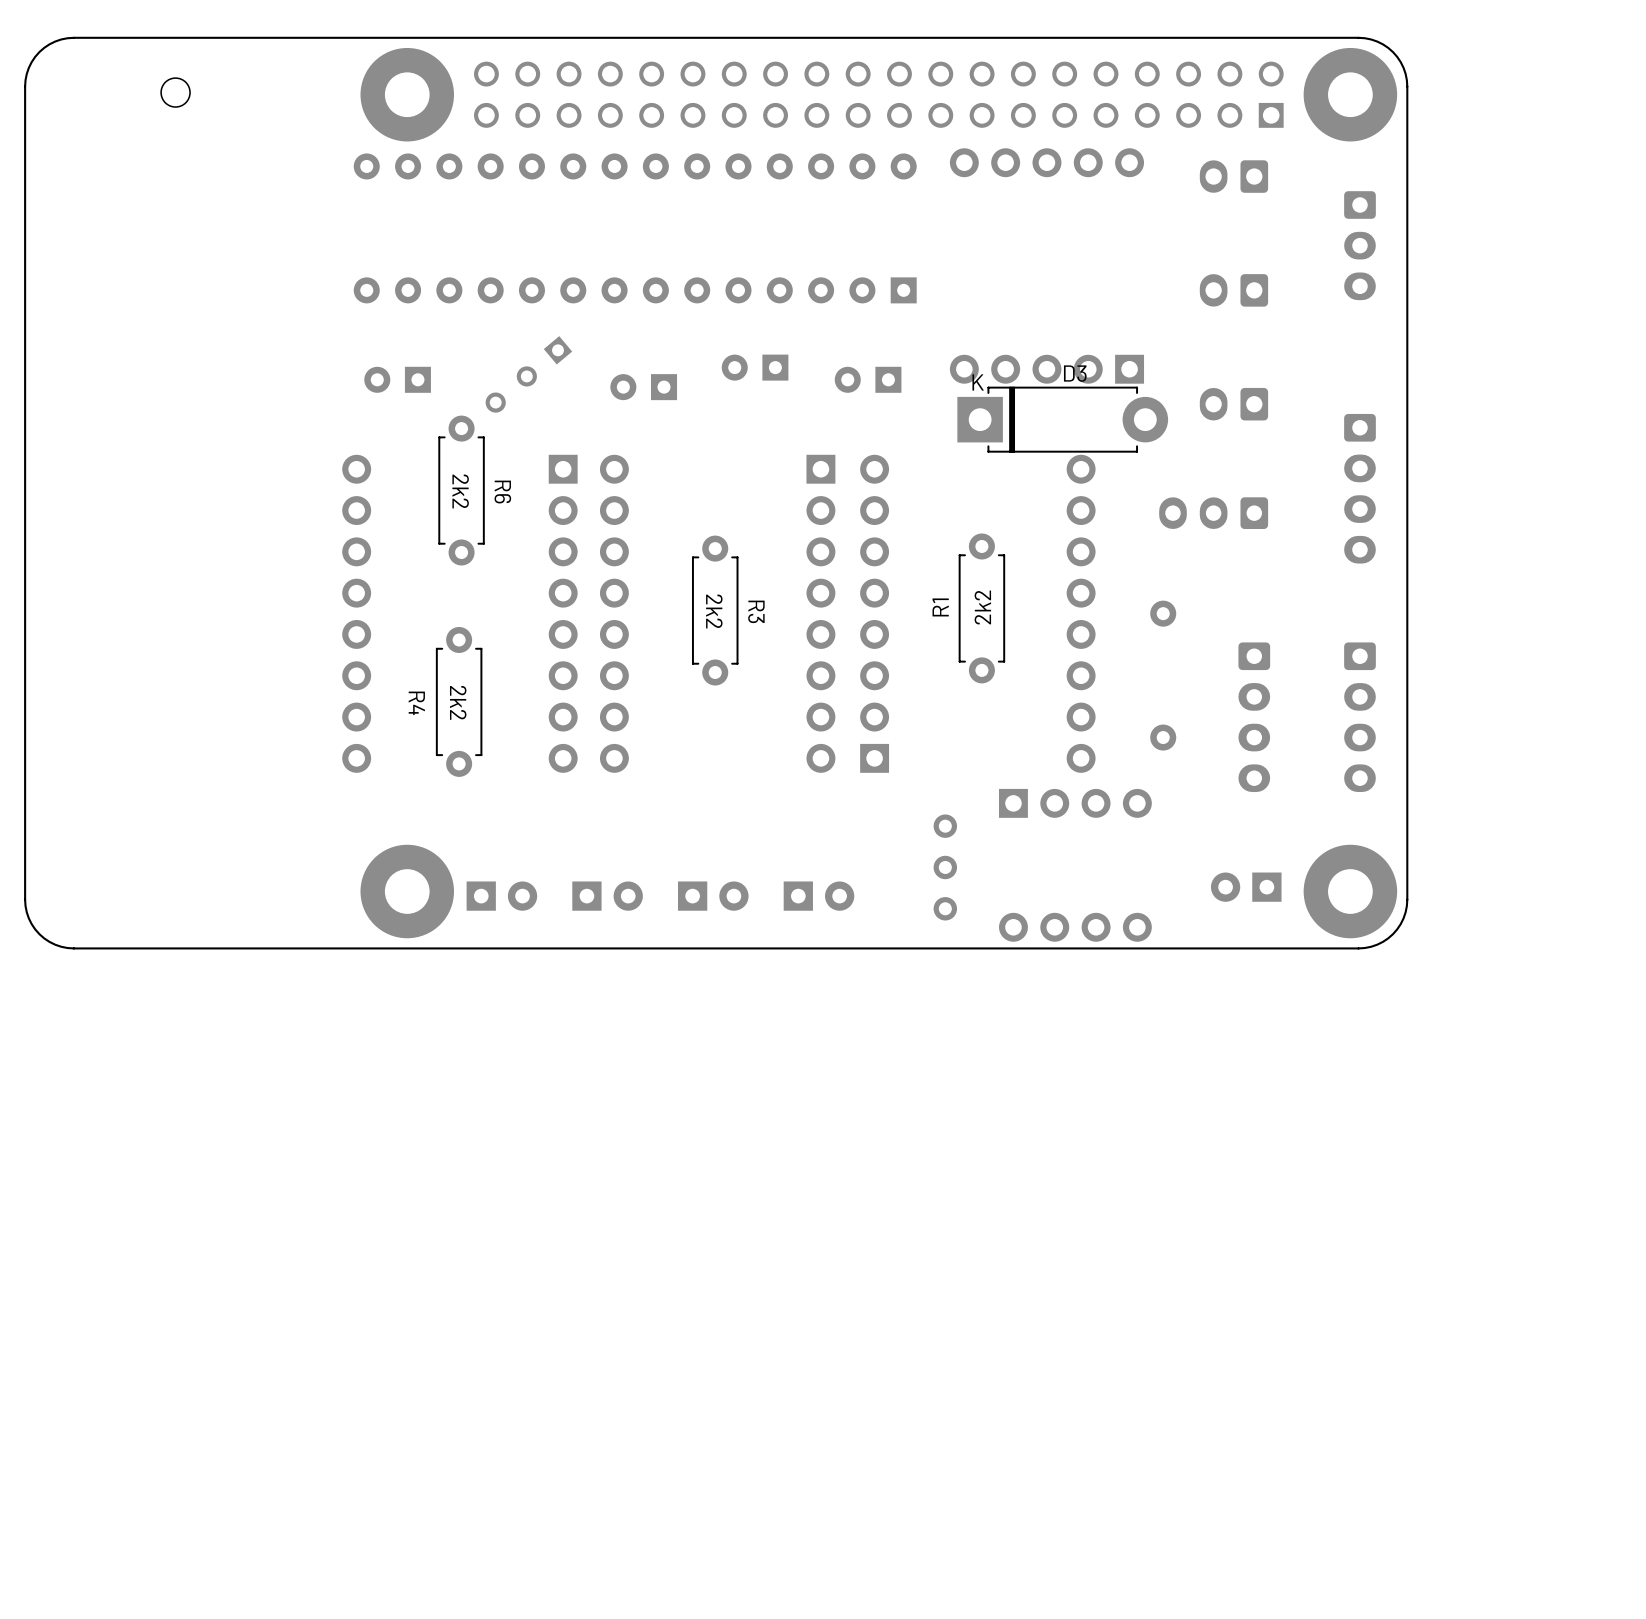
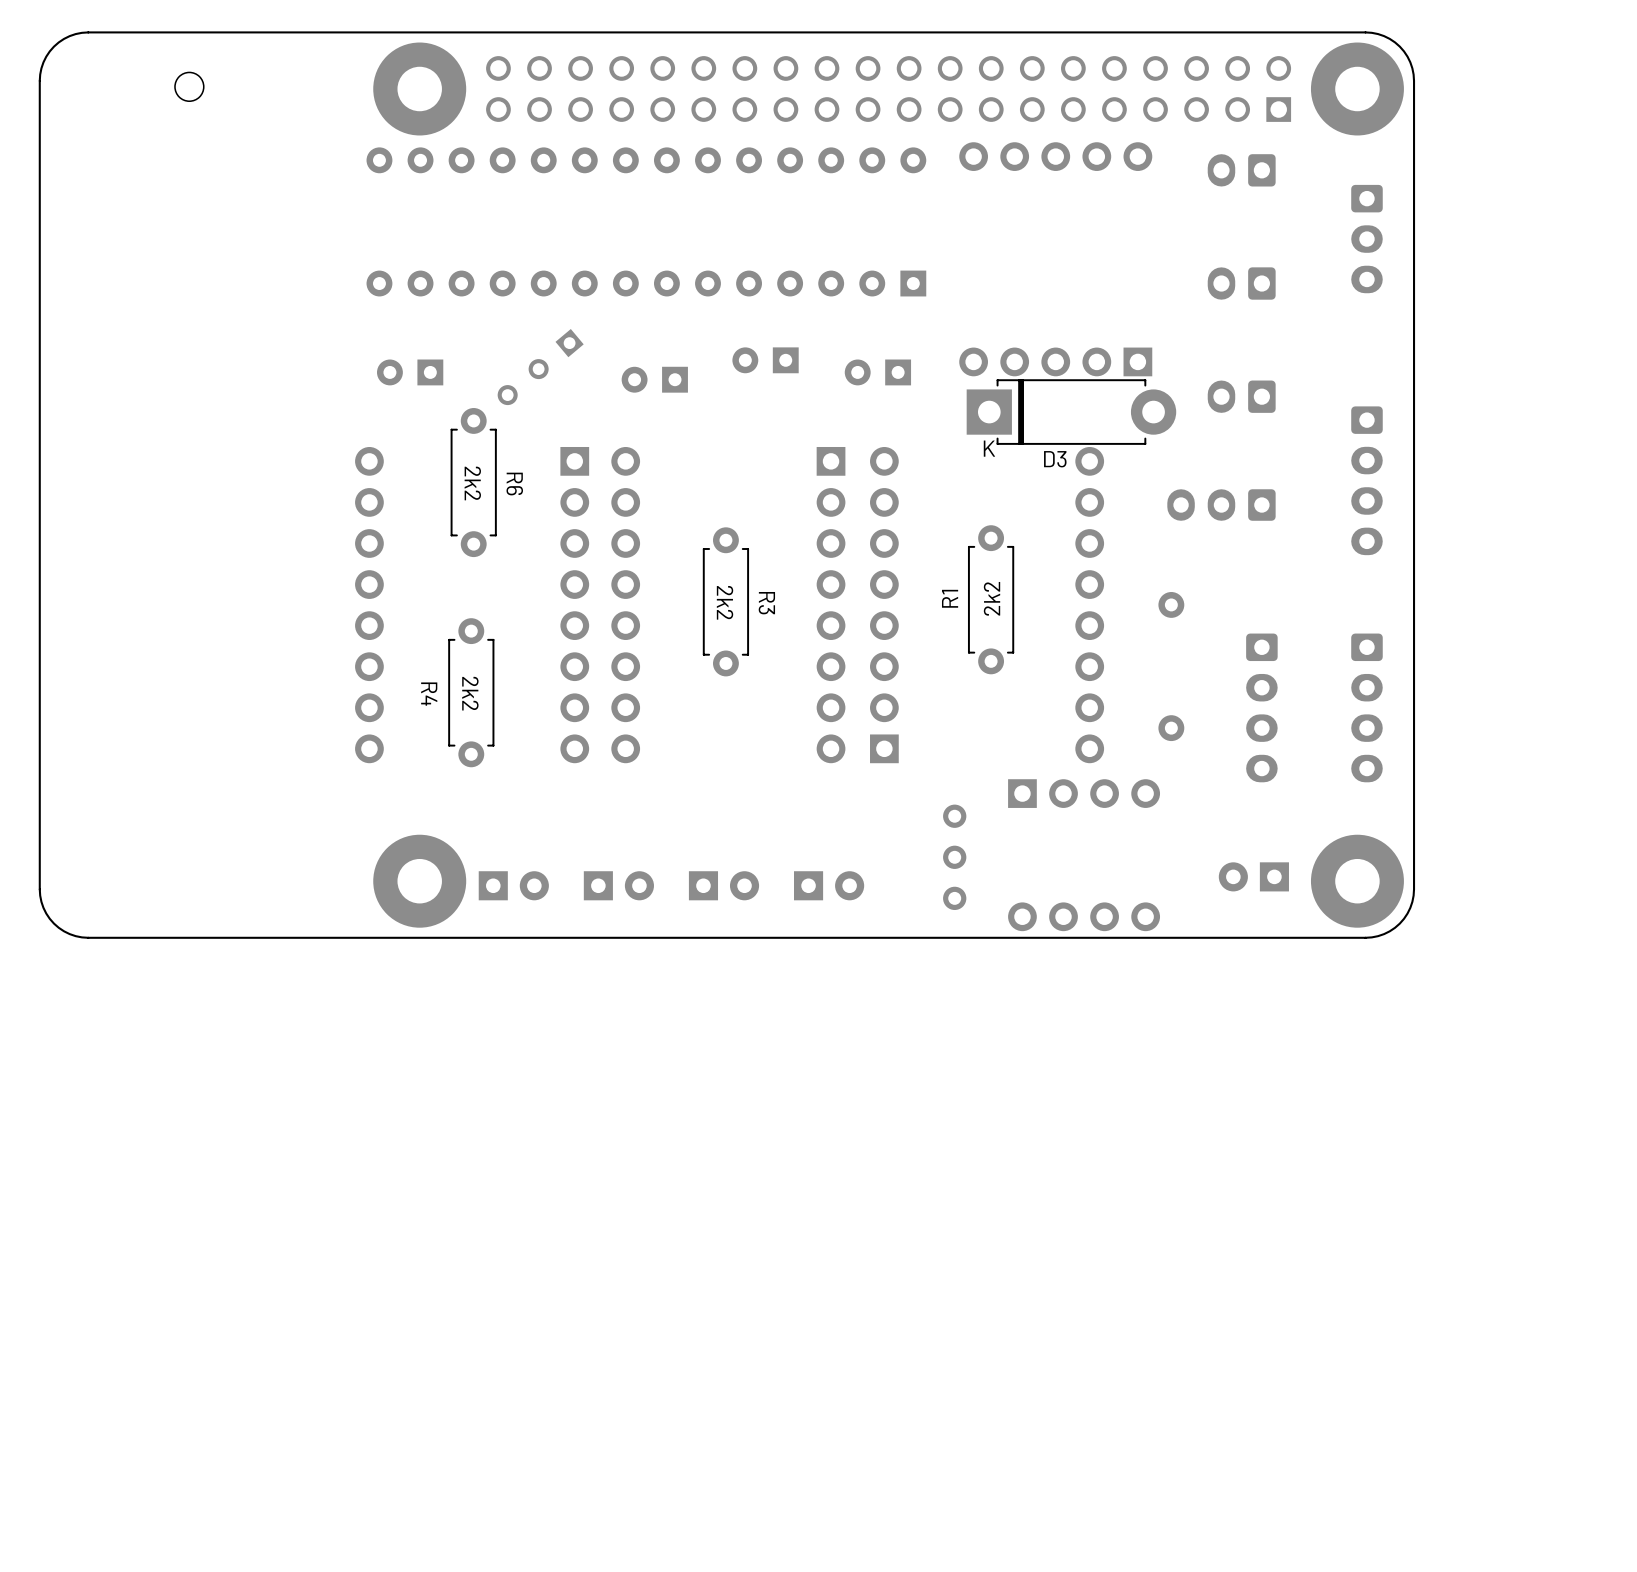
D3 name position: D3 (1075, 373) -> D3 (1055, 459)
D3 text position: K (978, 382) -> K (989, 448)

